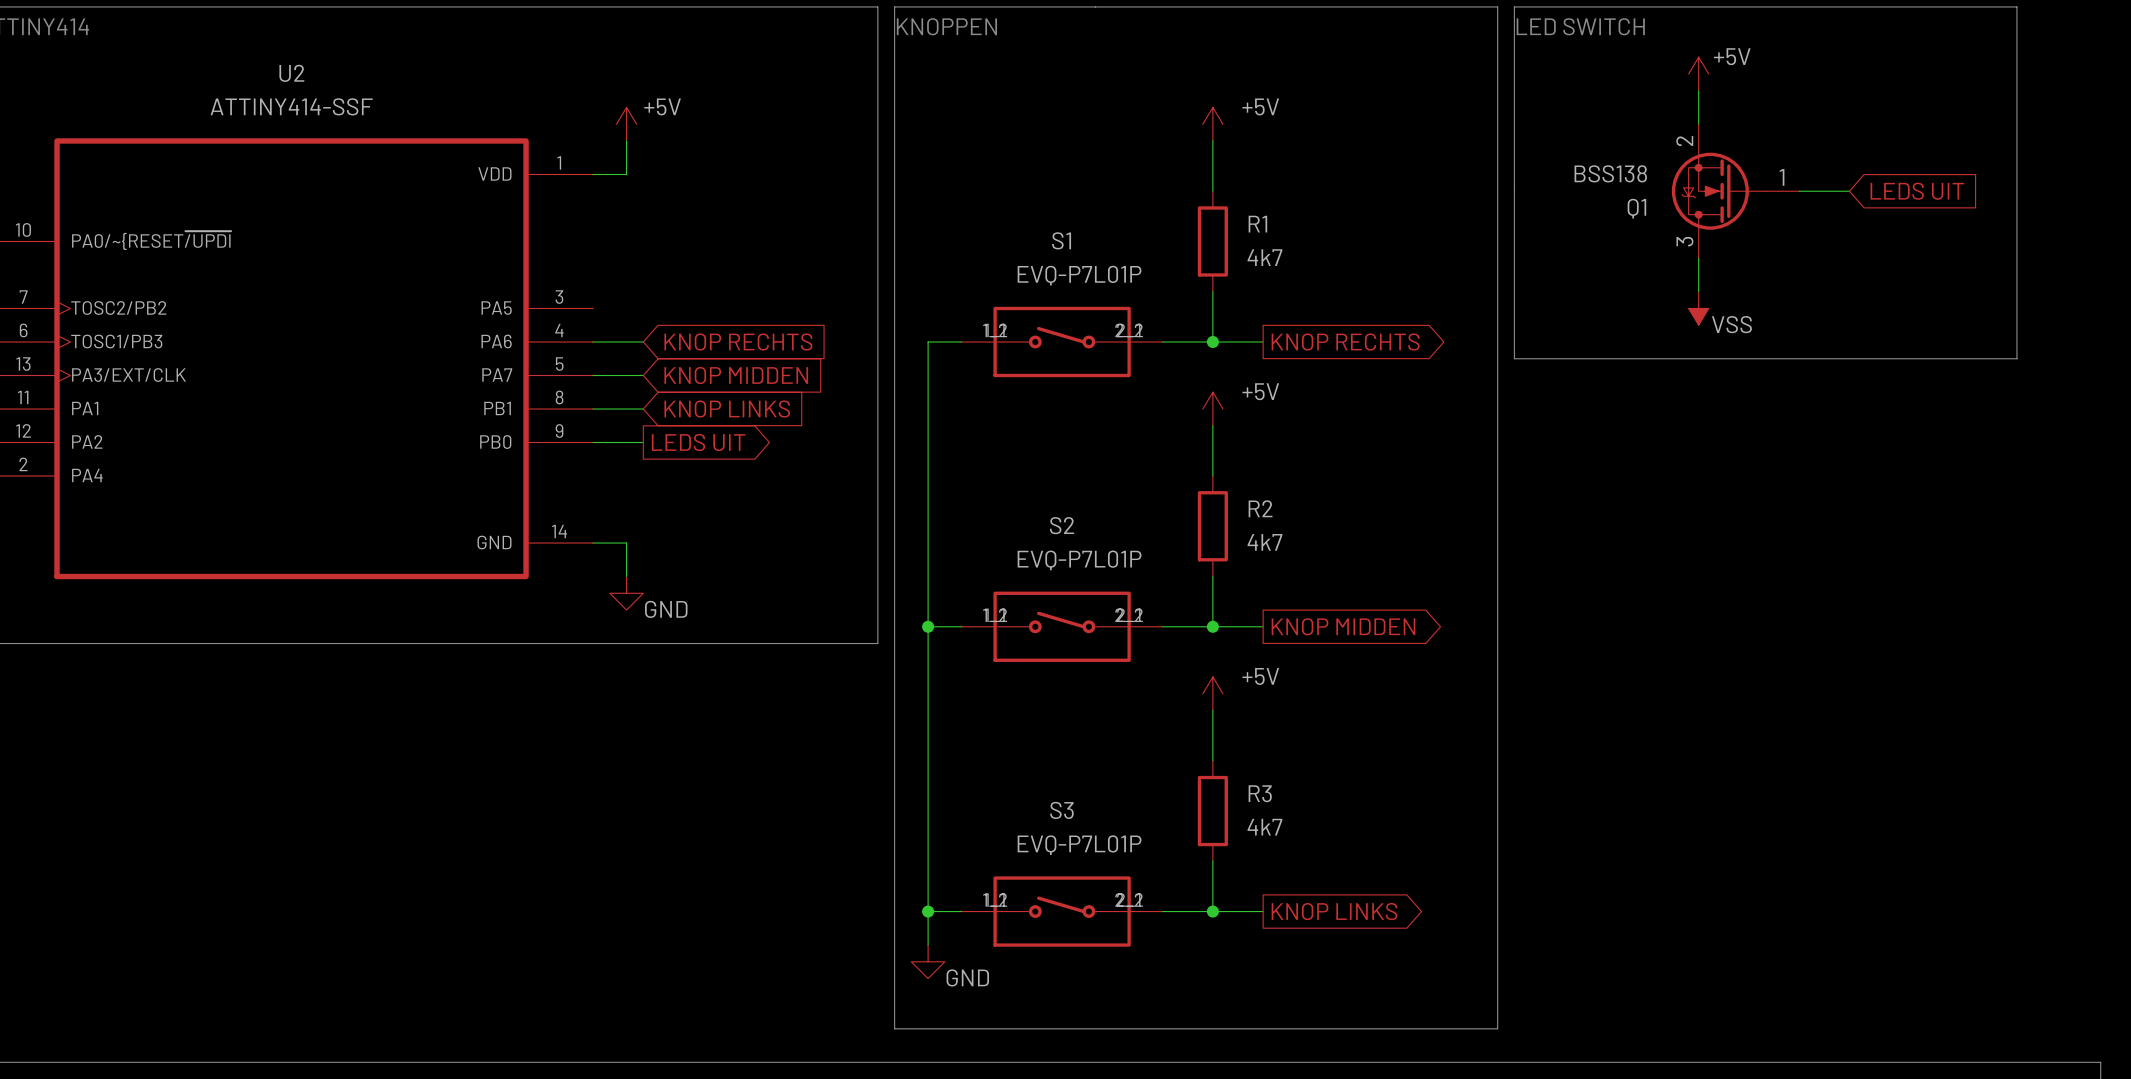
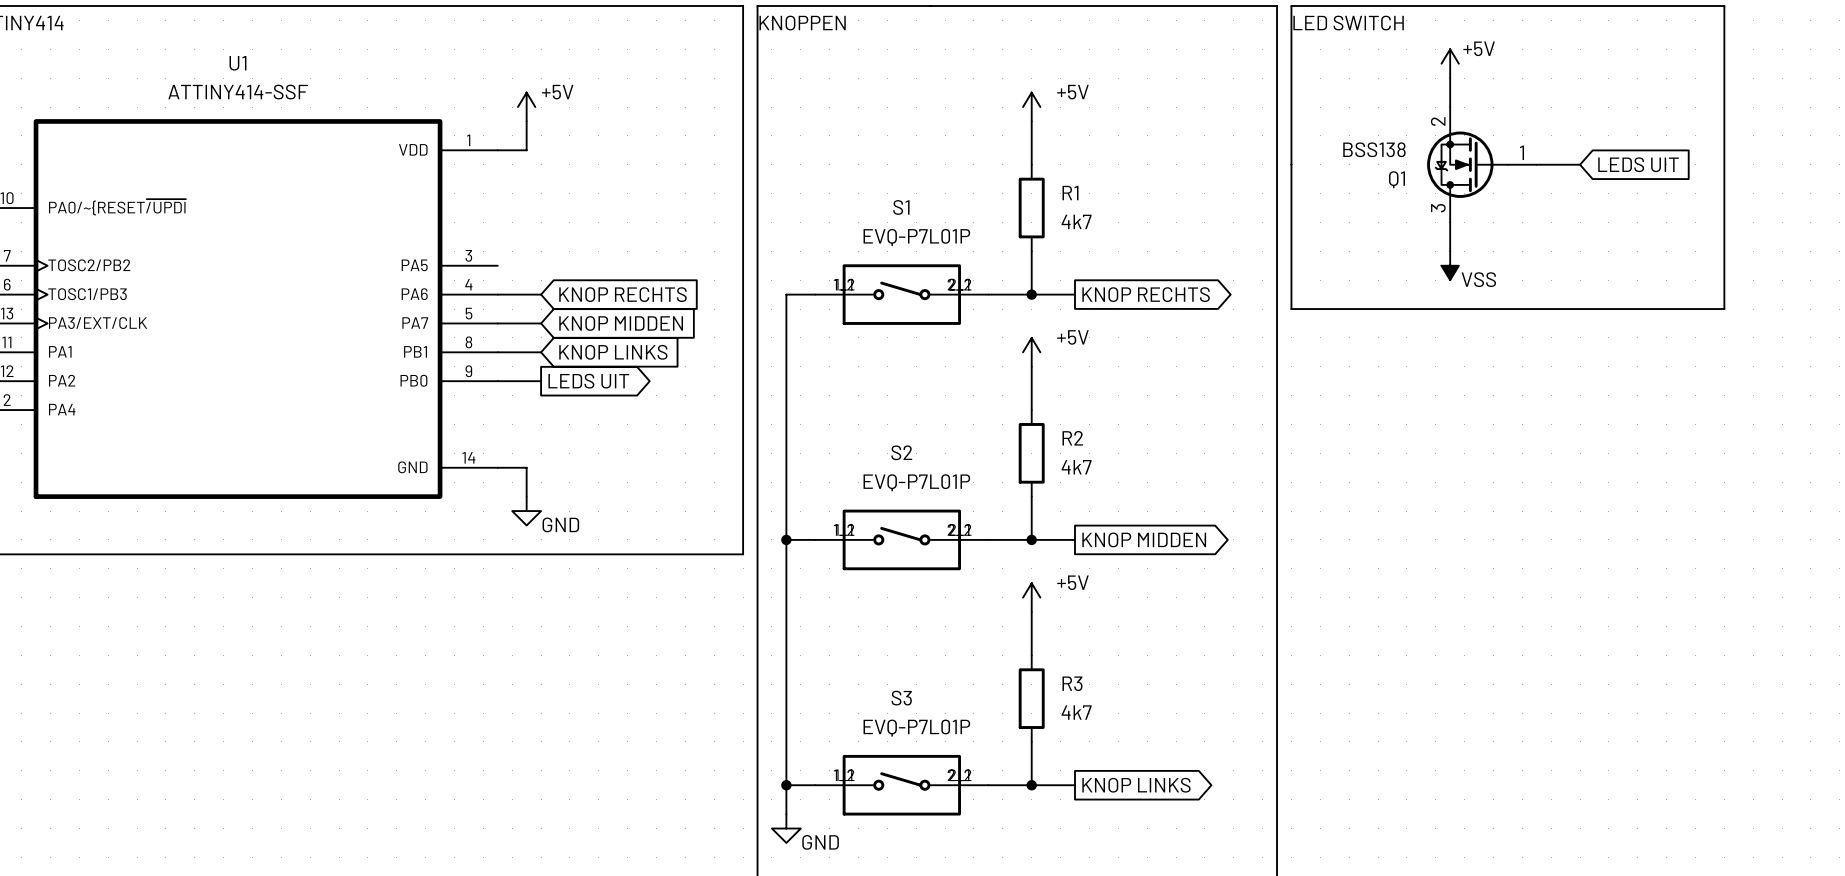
U2 name: U2 (291, 73) -> U1 (237, 63)

